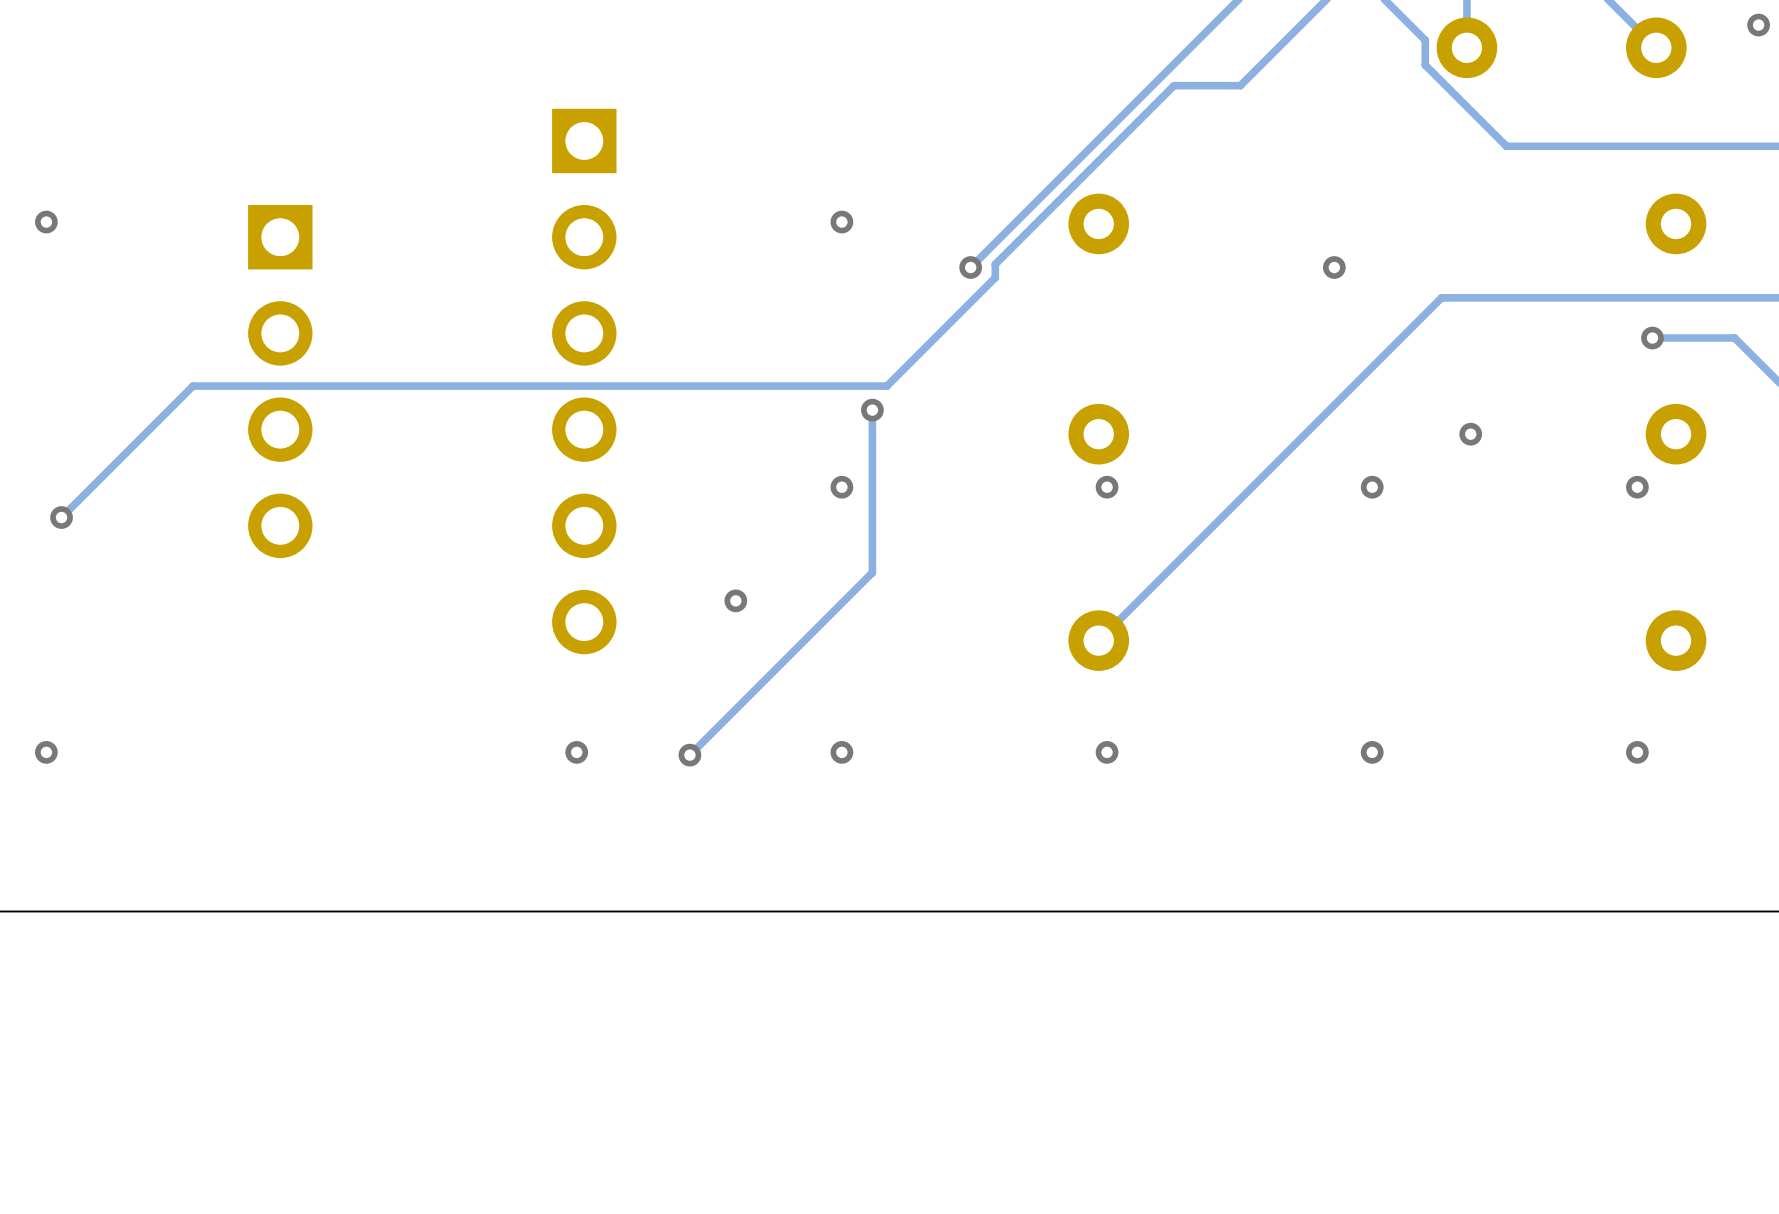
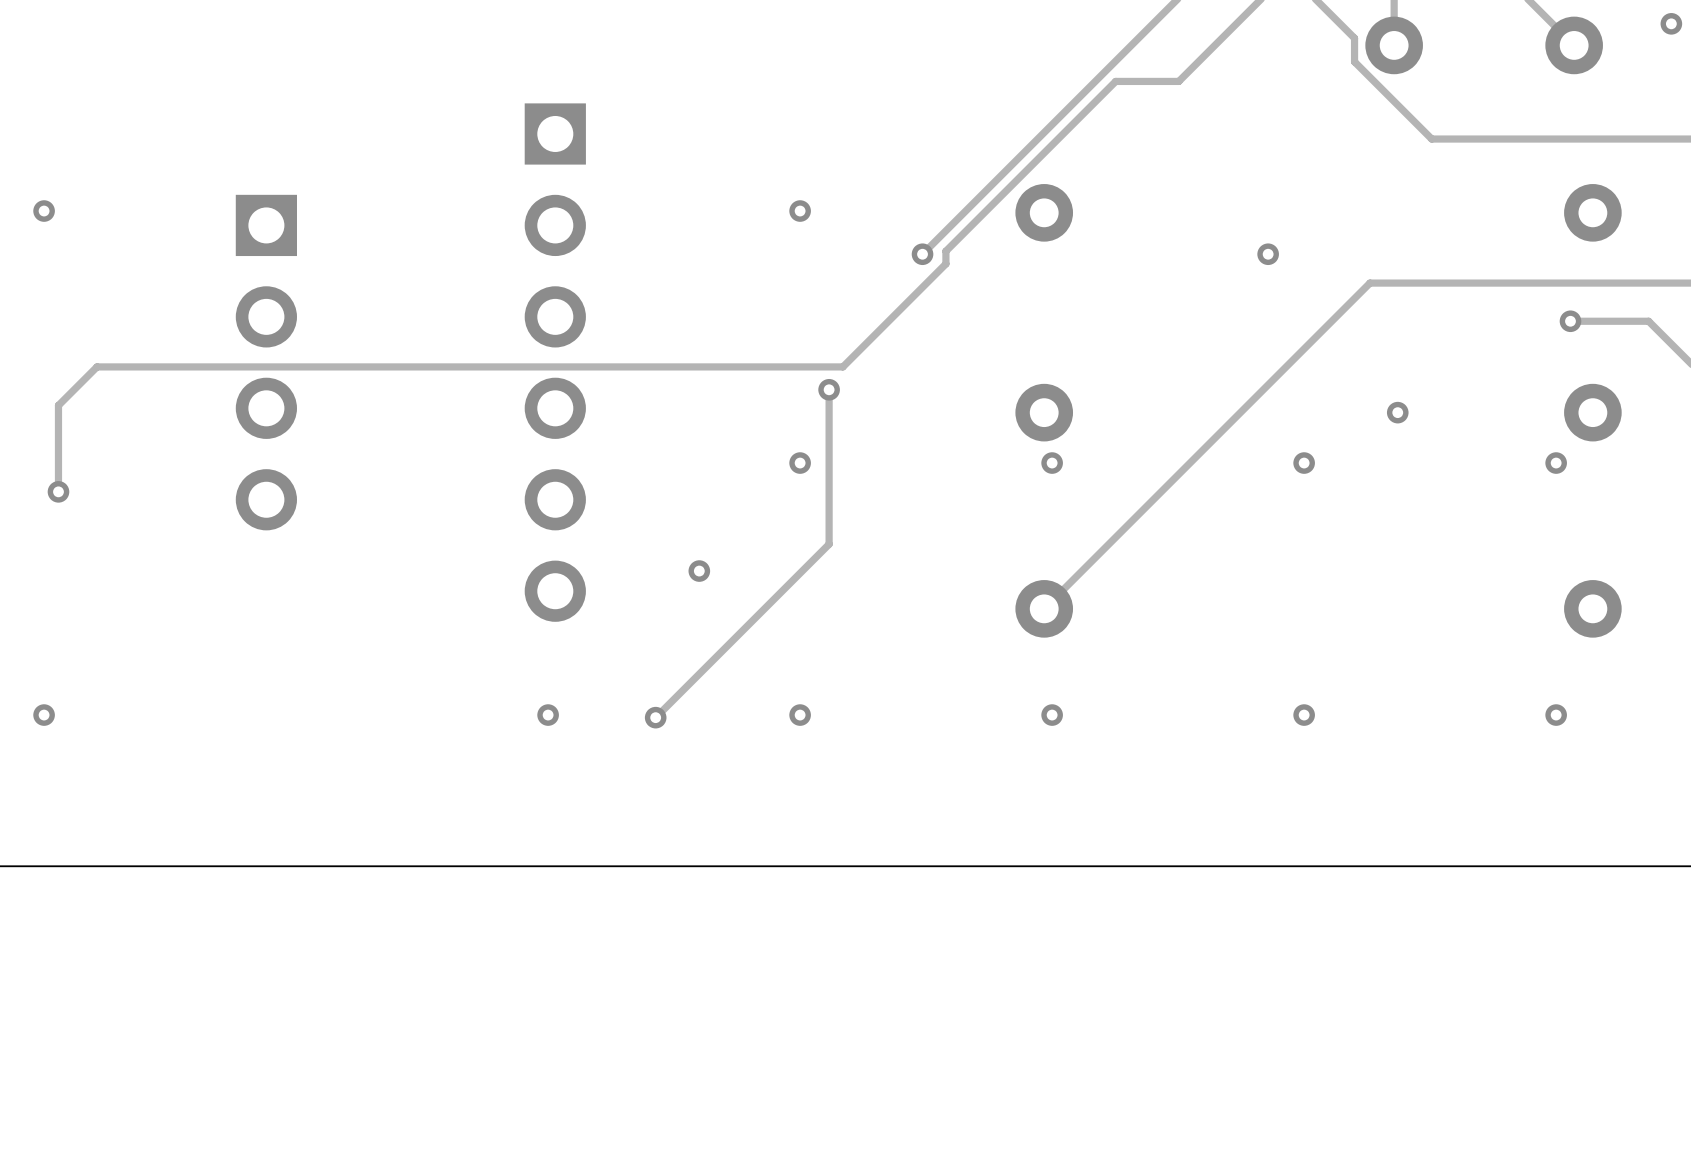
track: (192, 386) (61, 517) -> (183, 366) (97, 366) (58, 405) (58, 491)

